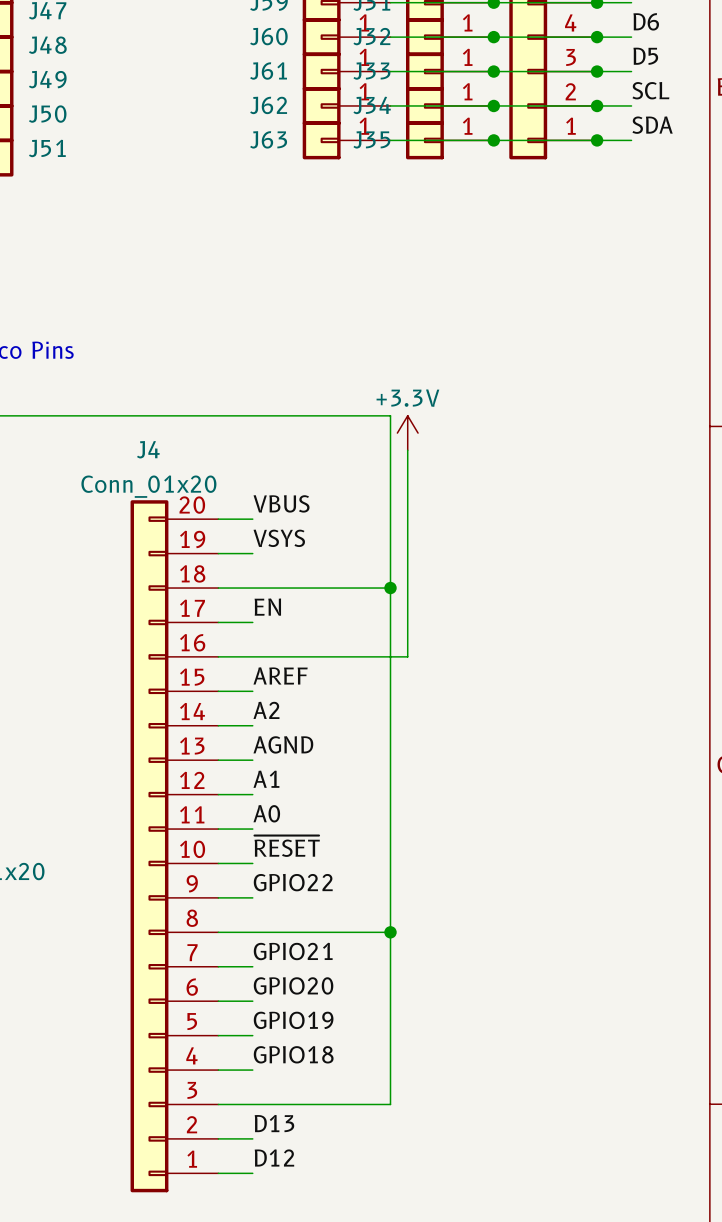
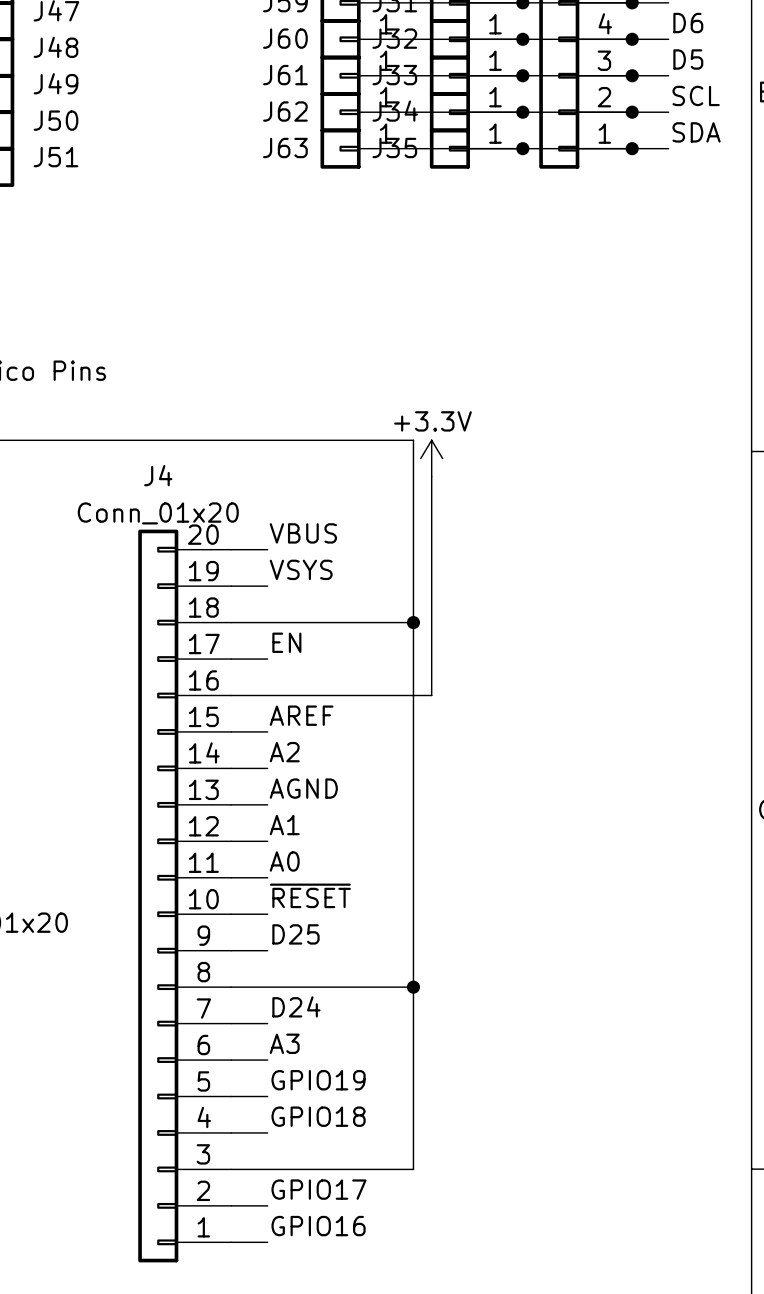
label: GPIO22 (293, 882) -> D25 (295, 934)
label: GPIO21 (293, 951) -> D24 (296, 1006)
label: GPIO20 (293, 985) -> A3 (284, 1043)
label: D13 (274, 1123) -> GPIO17 (318, 1189)
label: D12 (274, 1157) -> GPIO16 (318, 1226)

